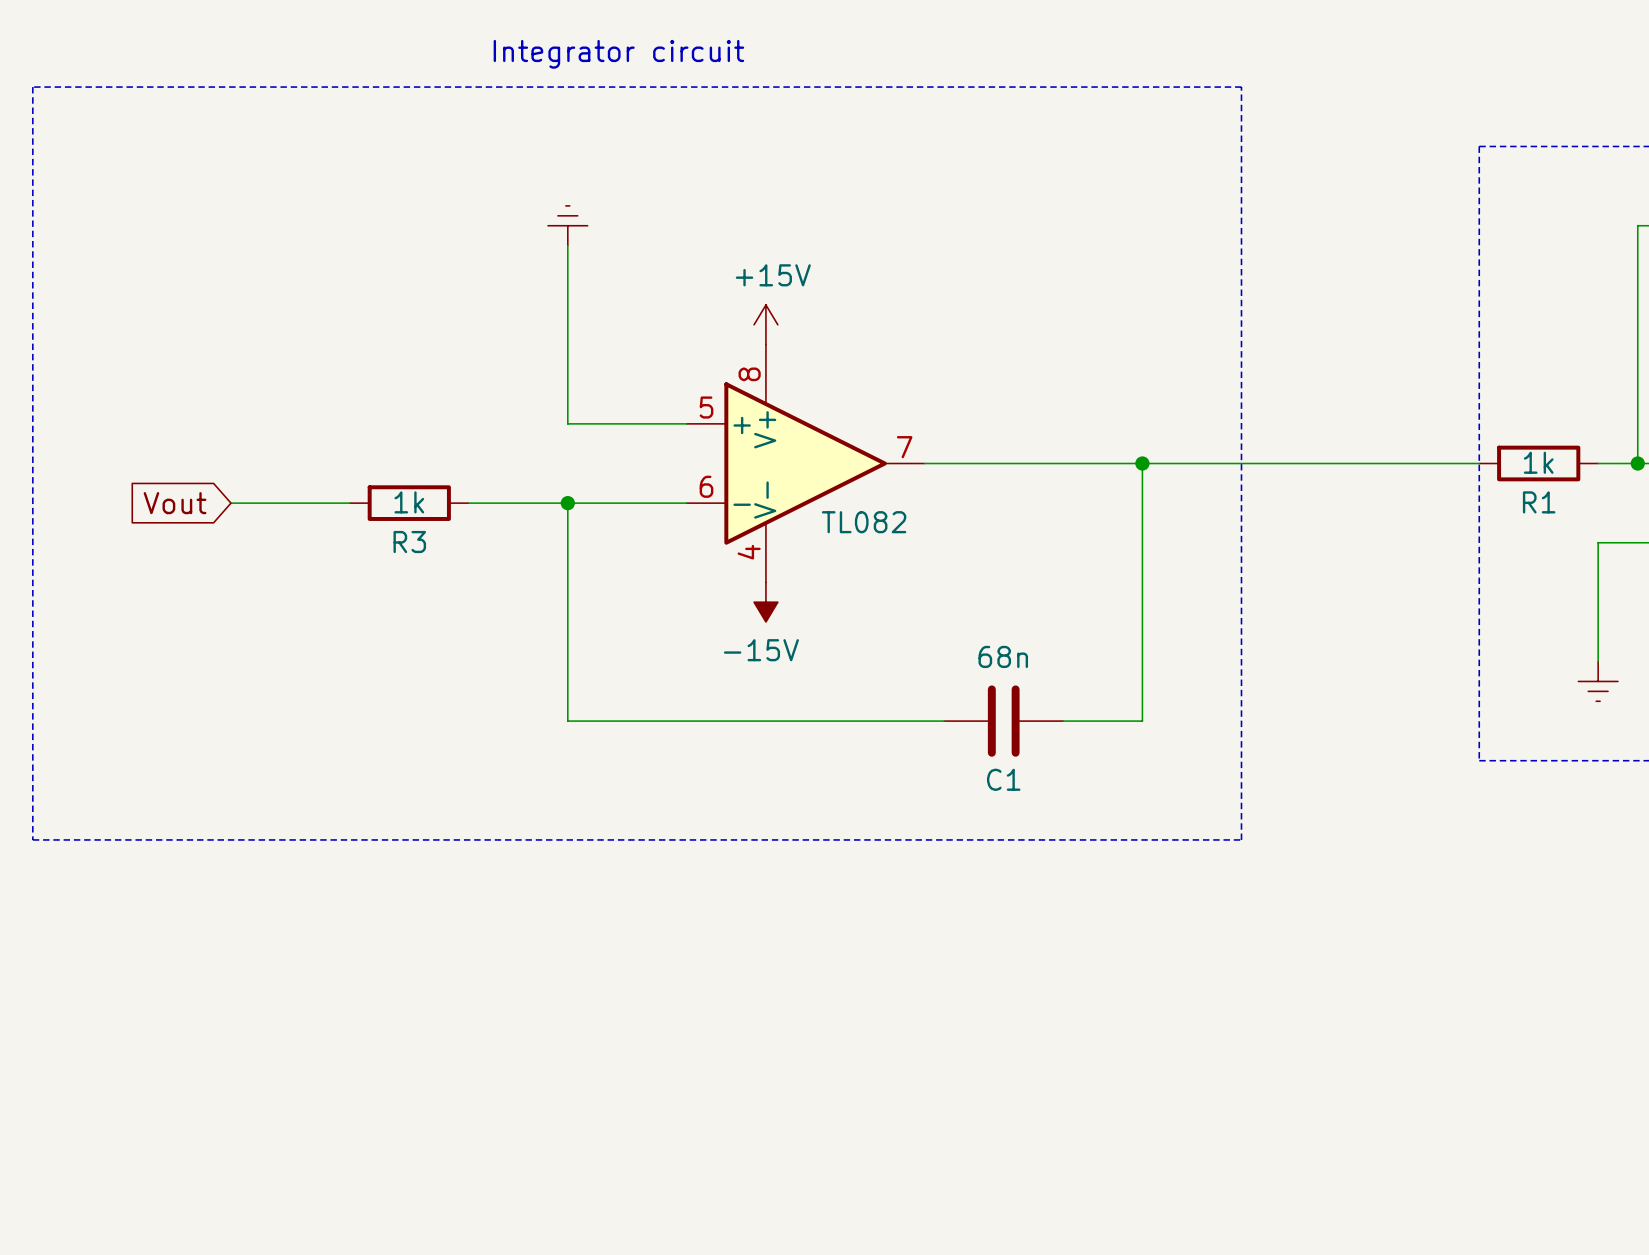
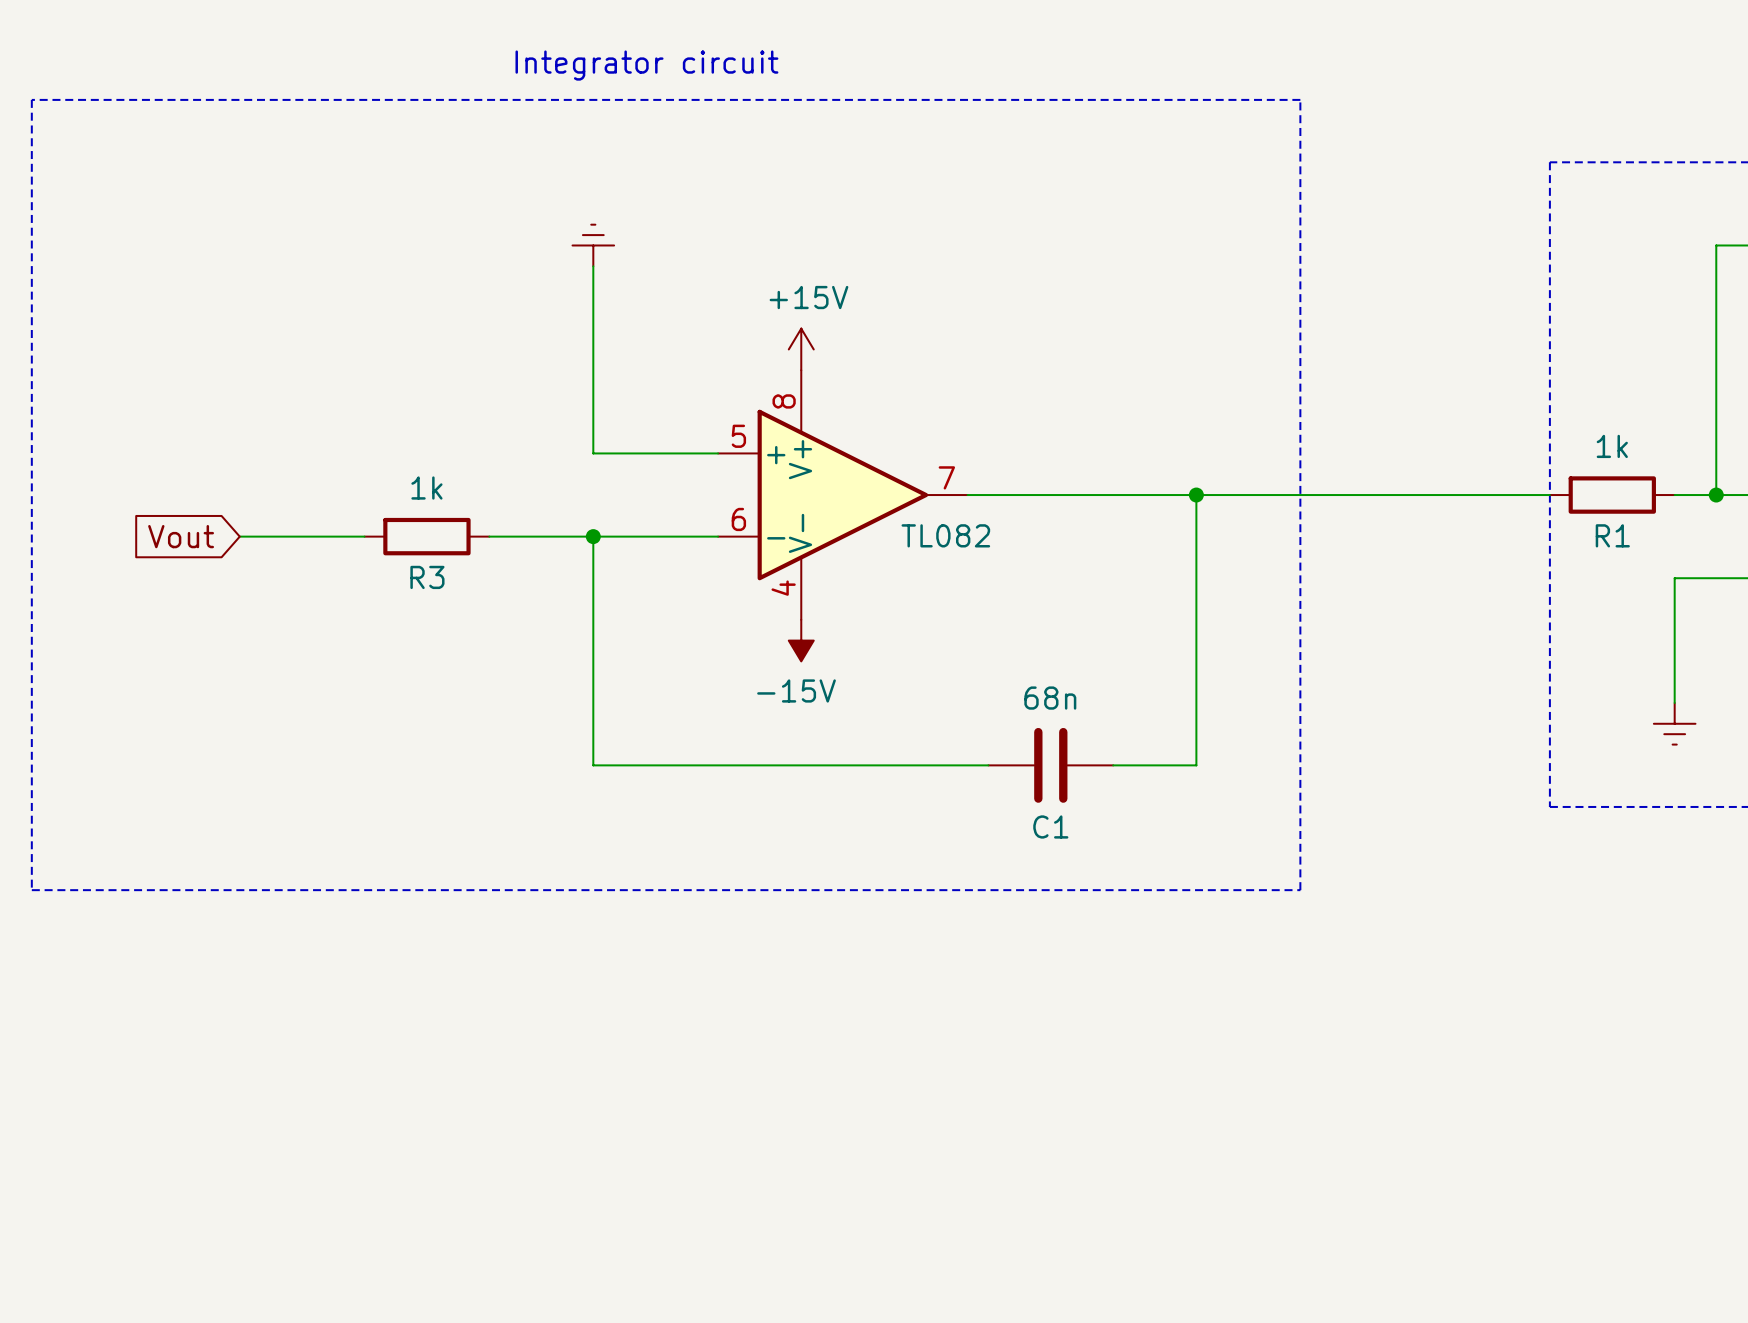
R1 value position: 1k (1538, 462) -> 1k (1612, 446)
R3 value position: 1k (409, 502) -> 1k (426, 488)
part value position: TL082 (864, 522) -> TL082 (945, 535)

